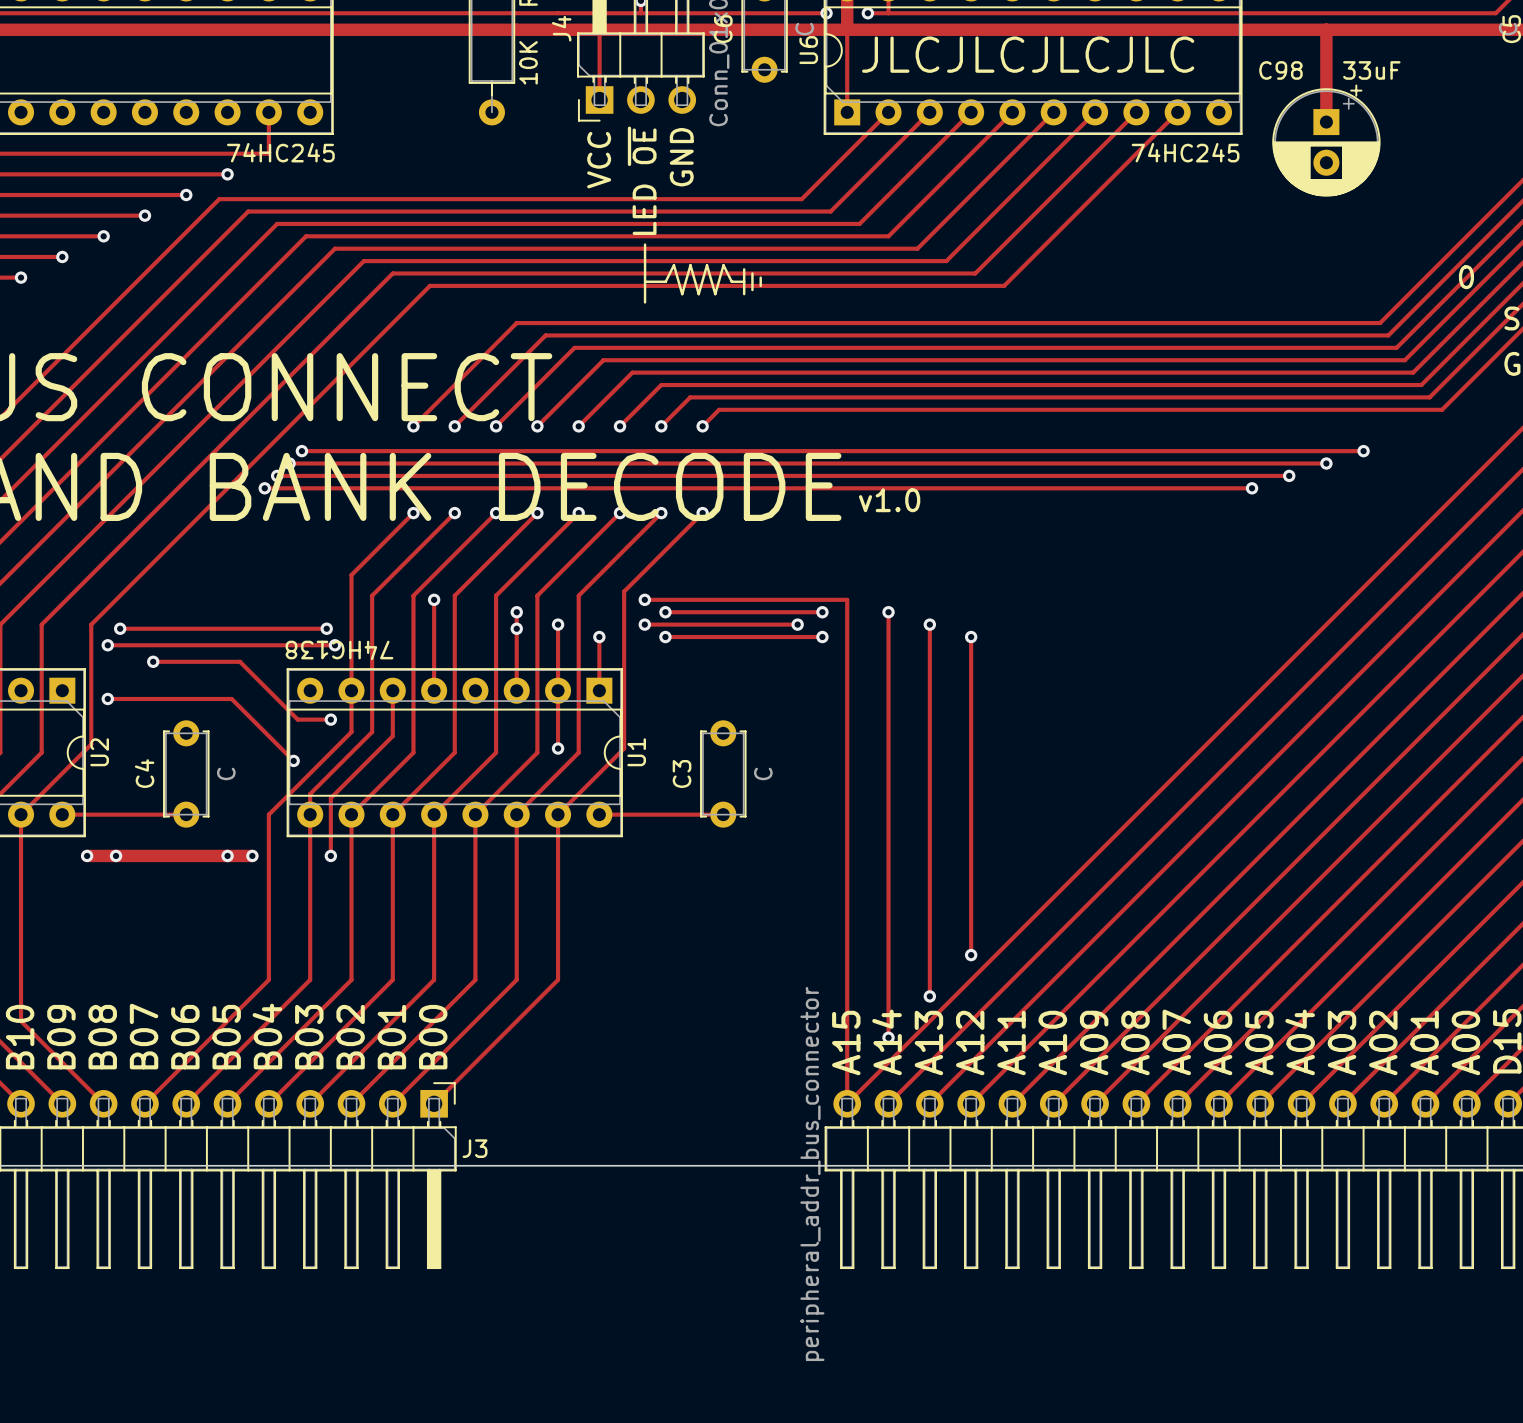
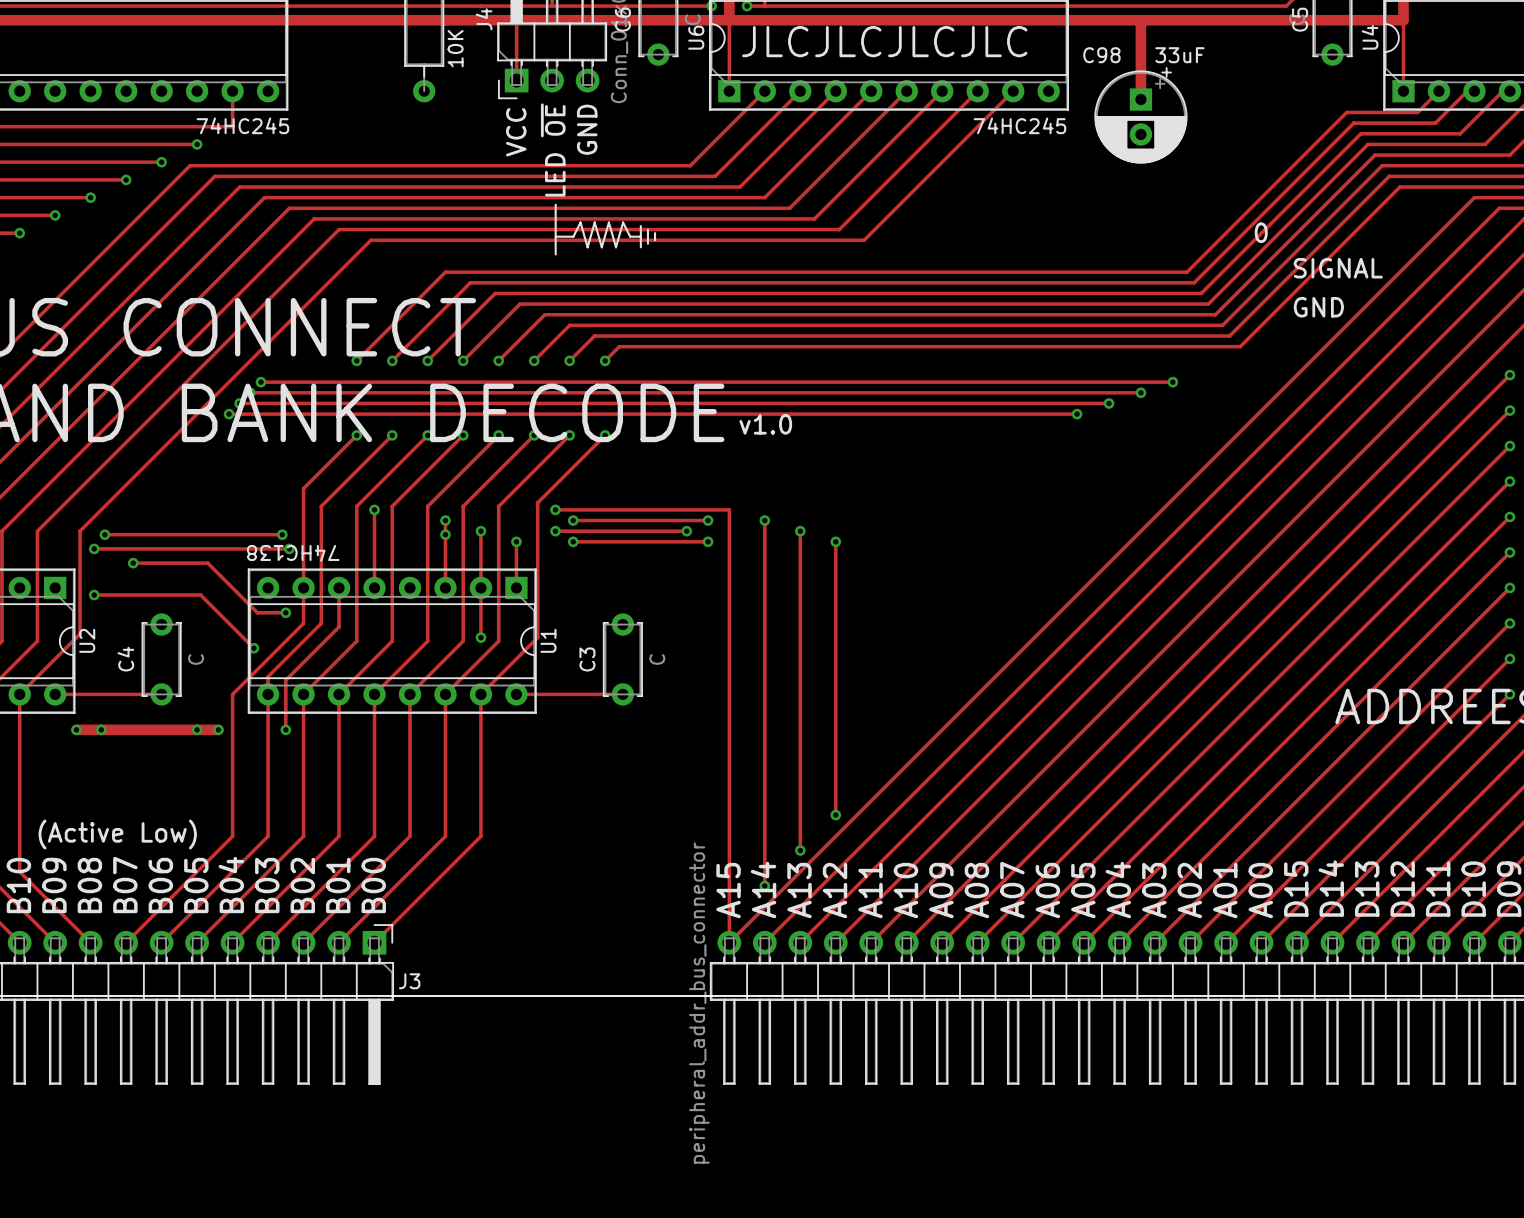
text: none -> (Active Low) (117, 834)

